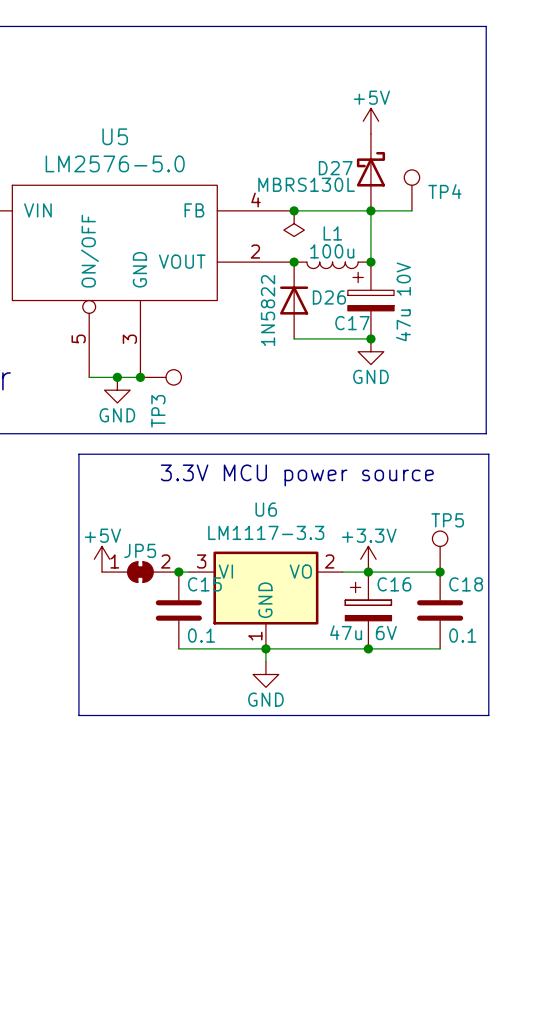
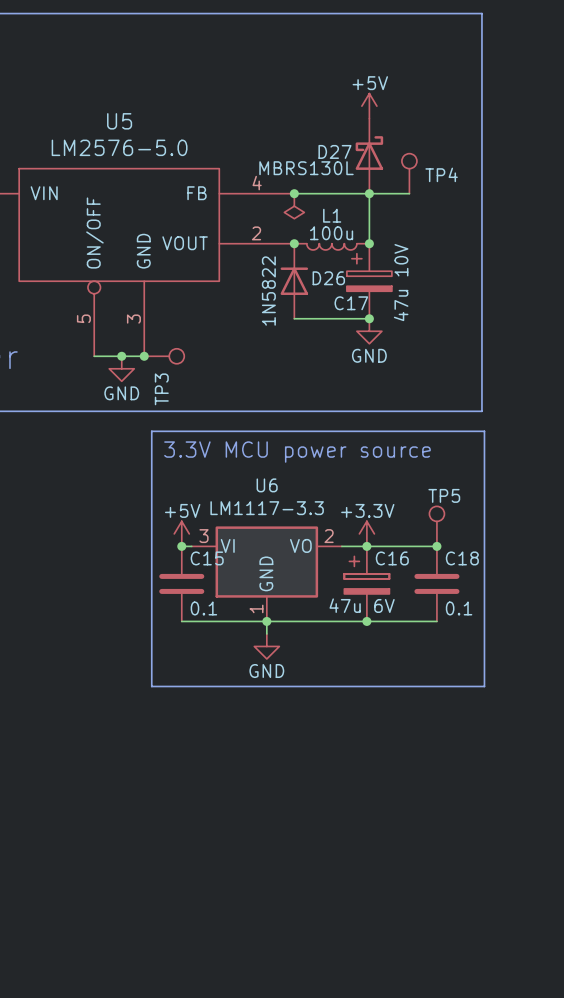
line: (148, 454) (78, 454) (78, 715) (148, 715) -> (151, 431) (151, 686)
power symbol position: +5V (102, 559) -> +5V (181, 533)
JP5: (140, 572) -> none

